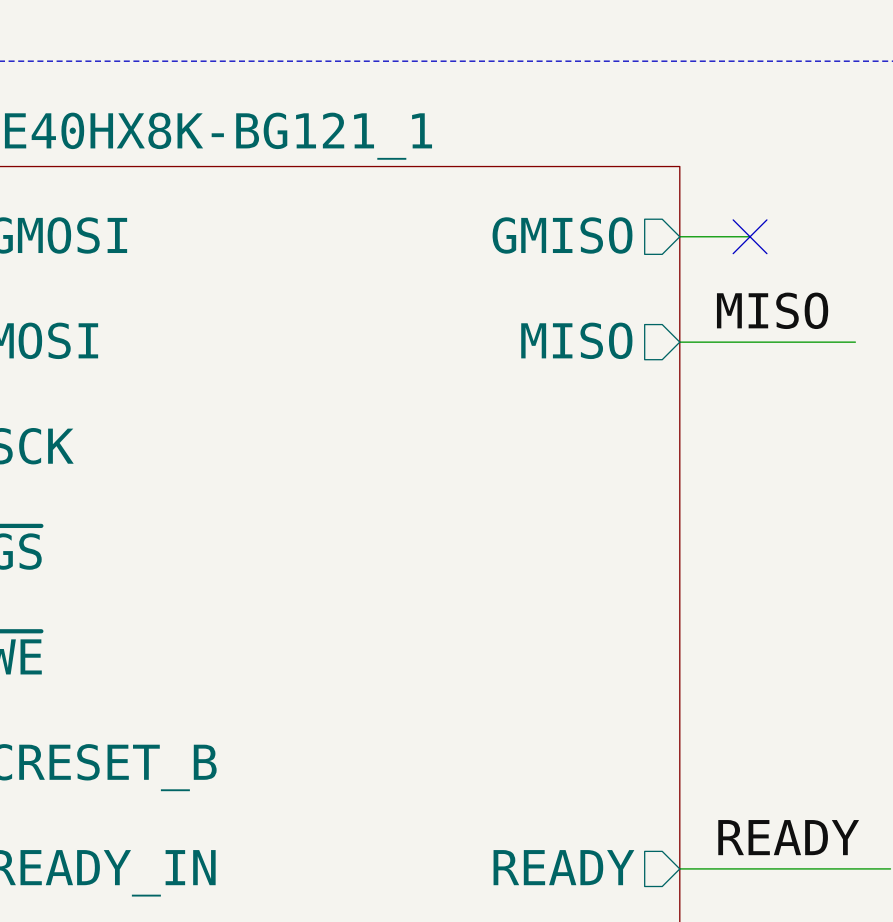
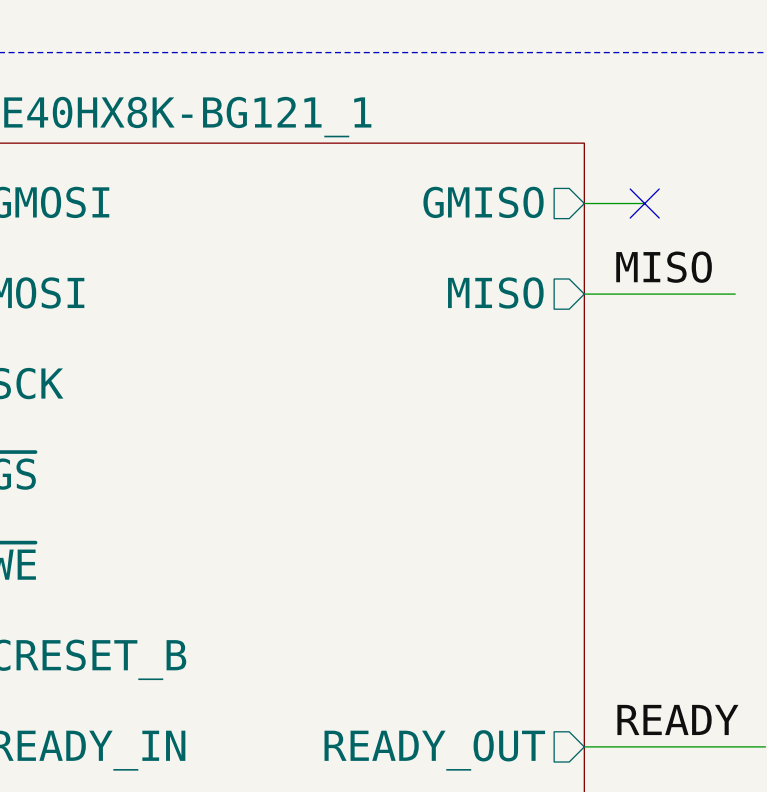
sheet pin: READY (563, 867) -> READY_OUT (434, 750)

